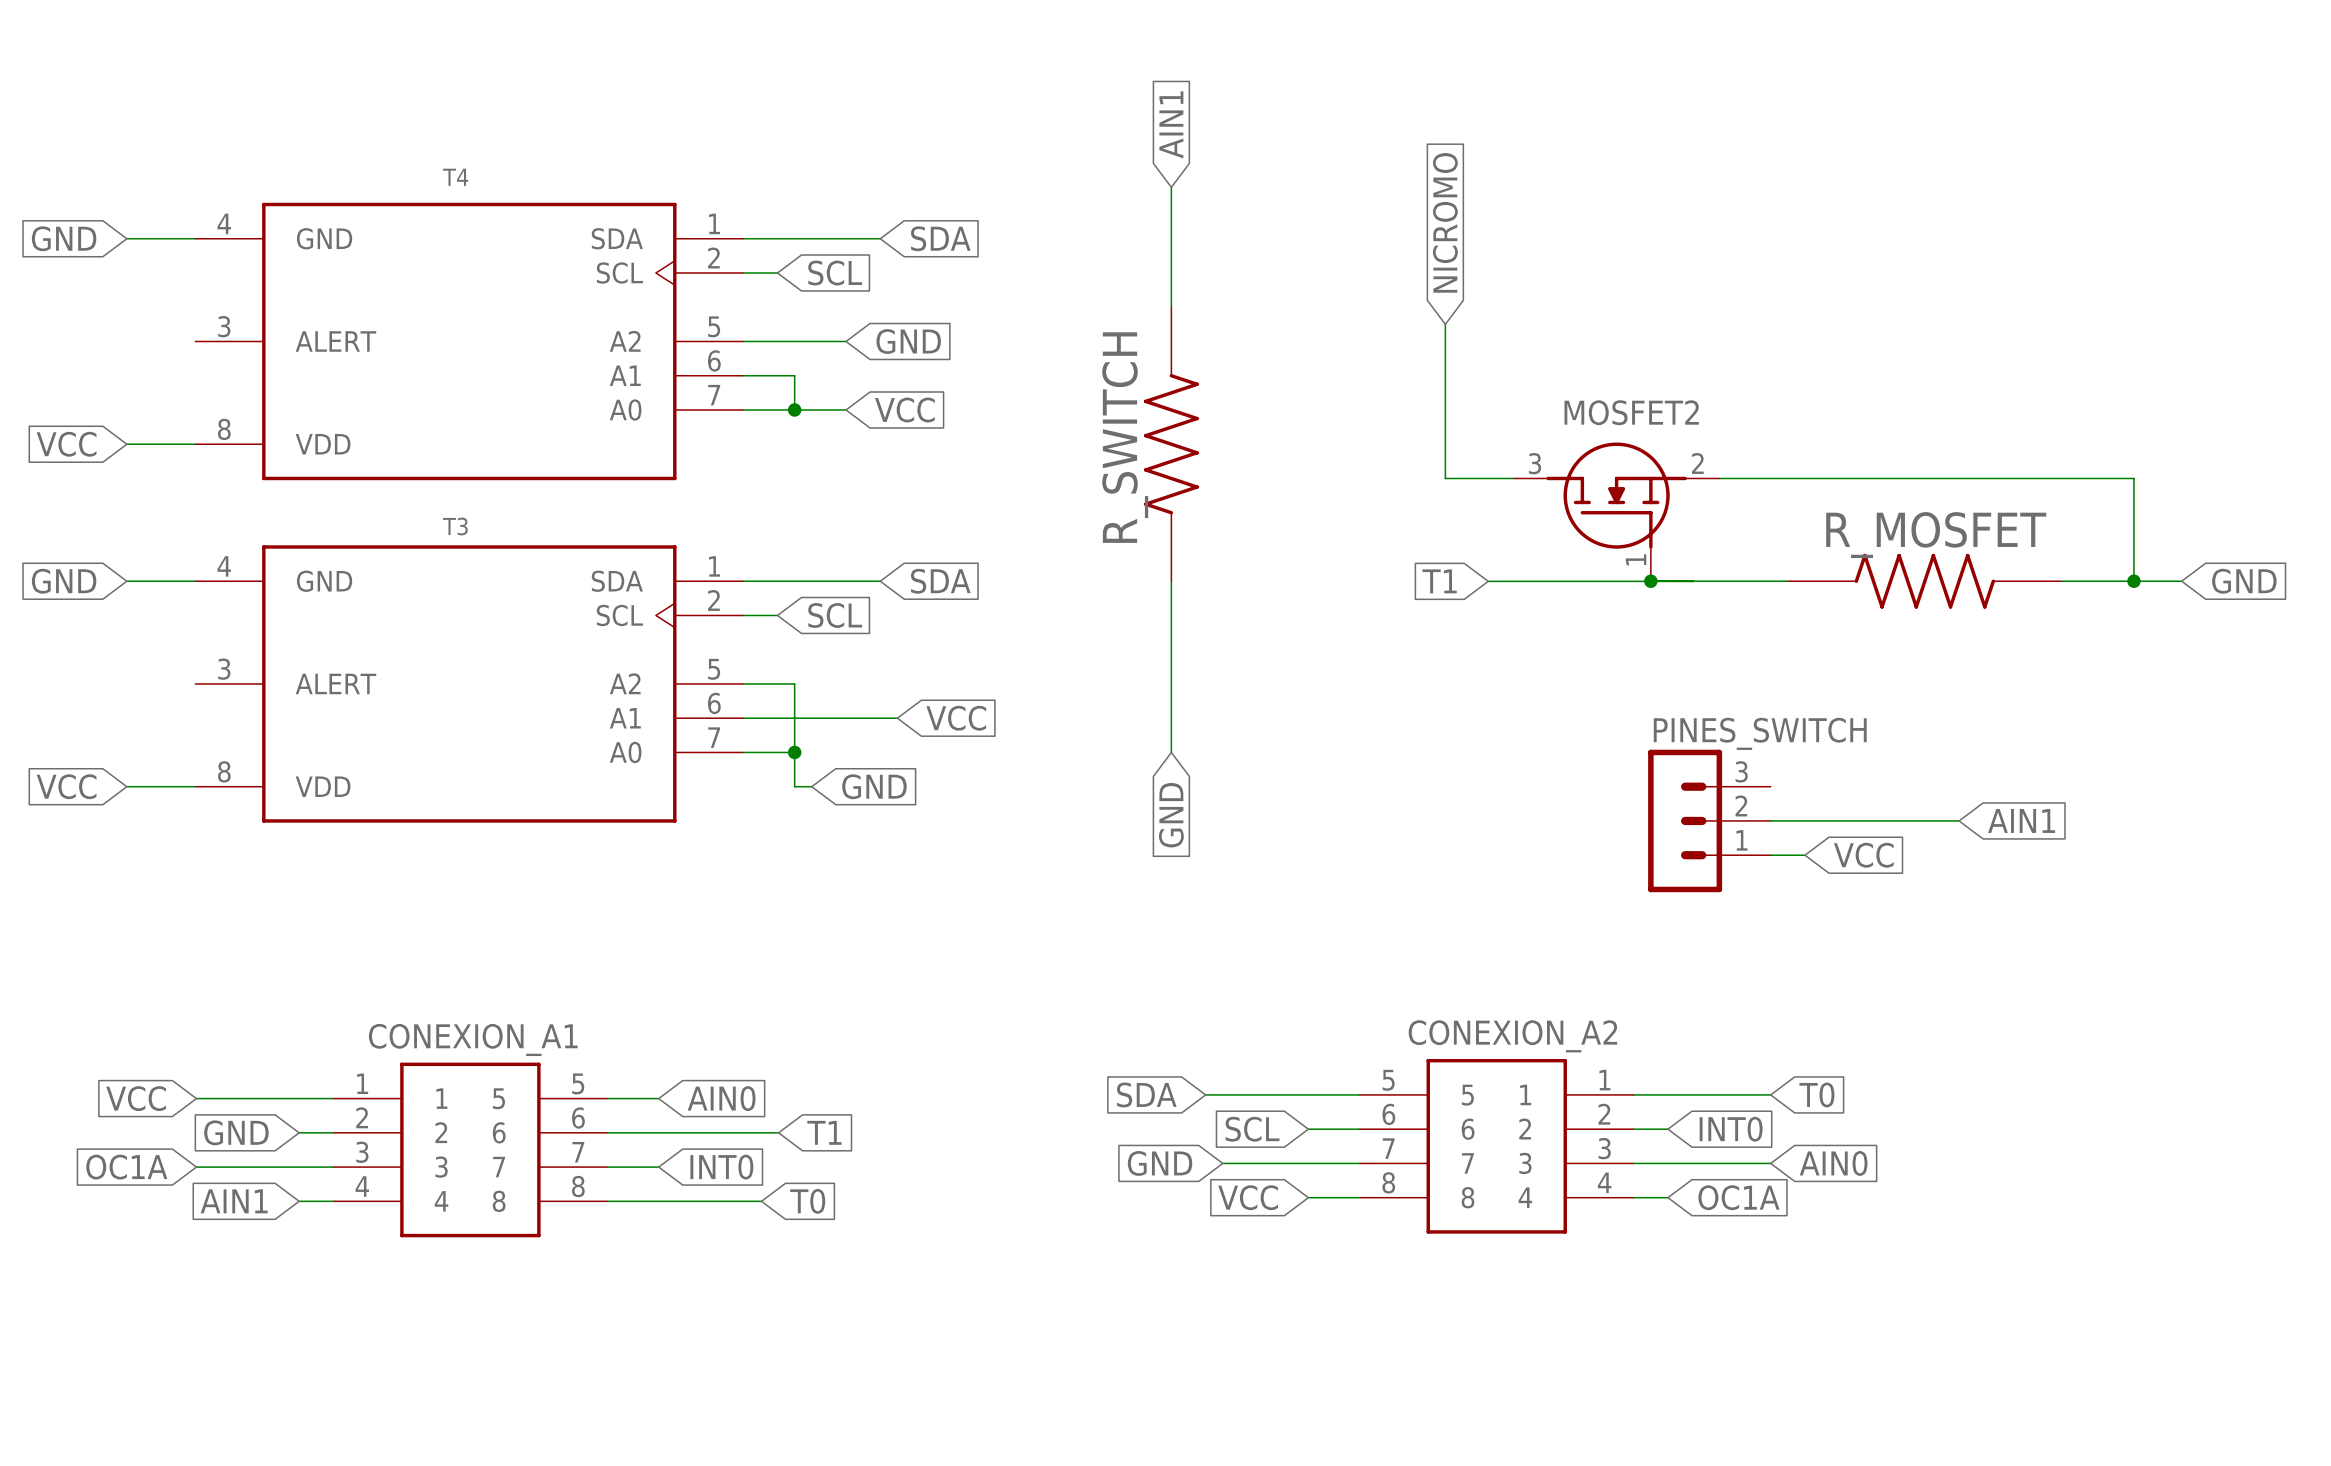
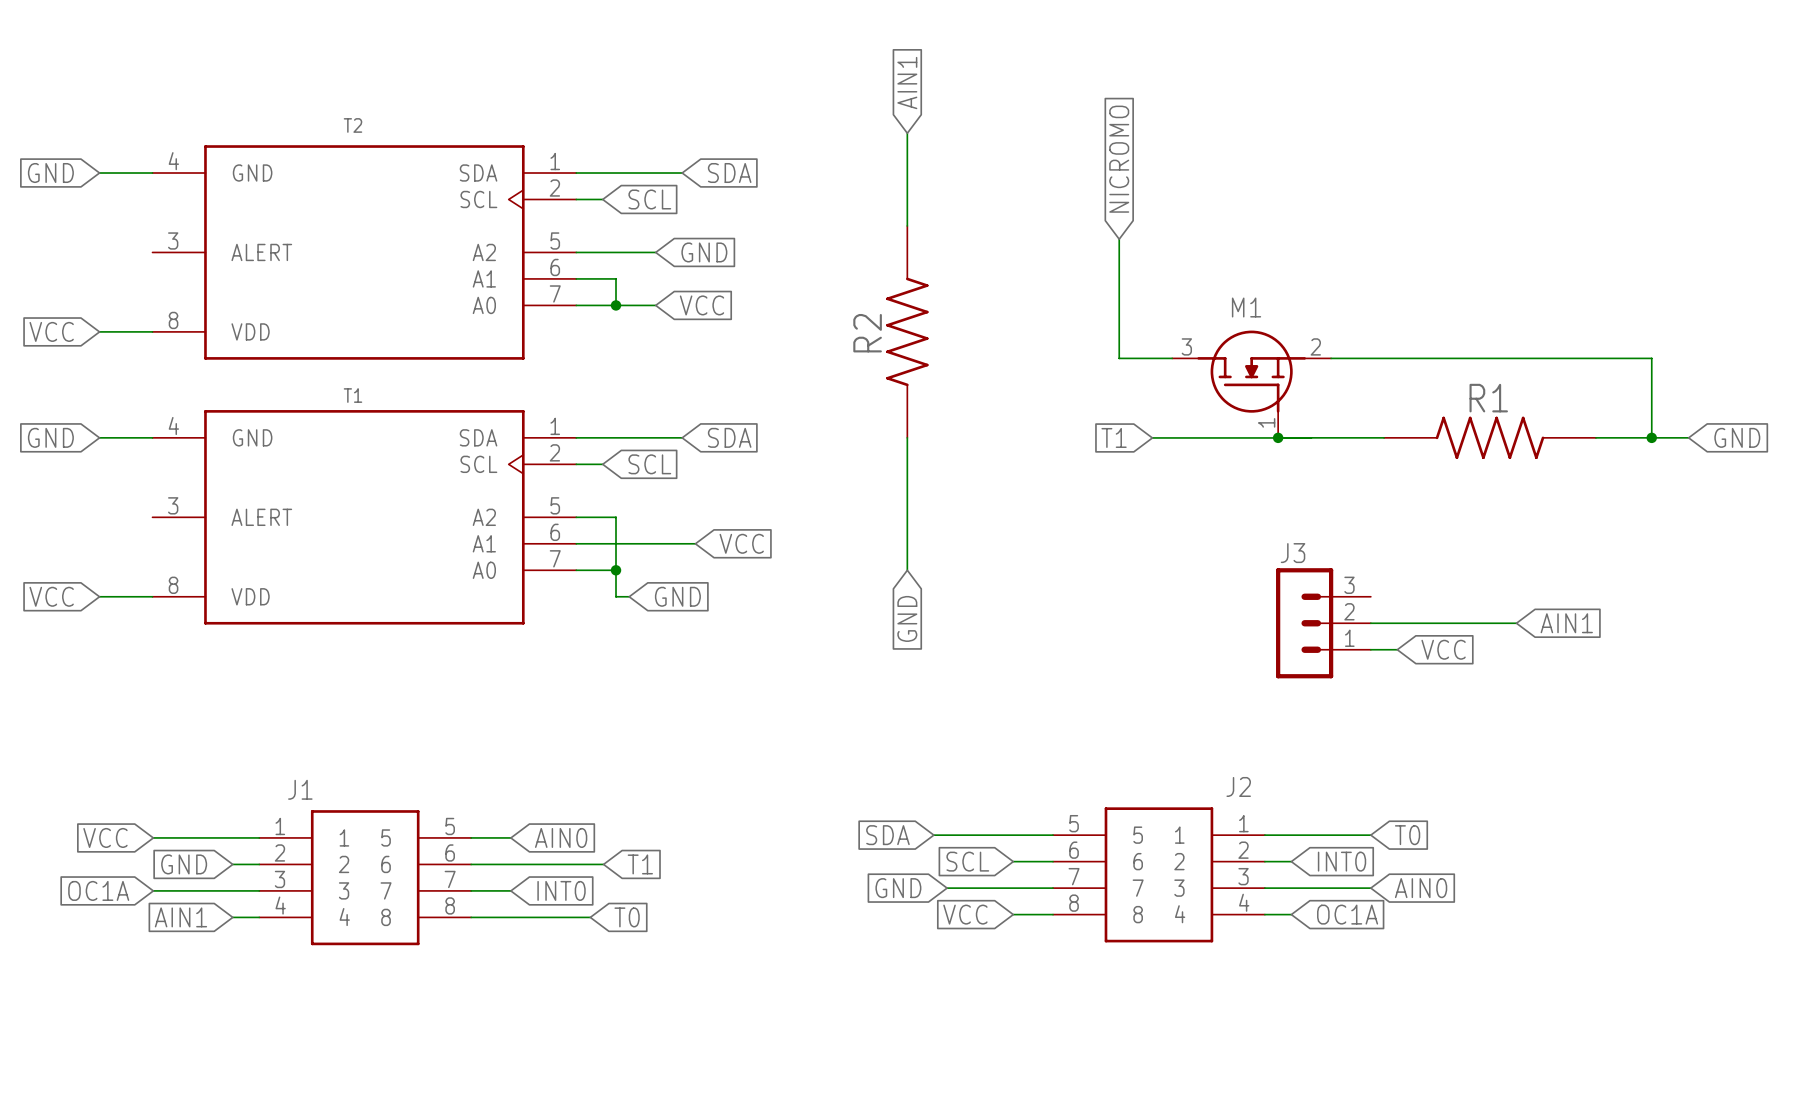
T4 name: T4 (455, 177) -> T2 (352, 125)
MOSFET2 name: MOSFET2 (1631, 412) -> M1 (1246, 307)
R_SWITCH name: R_SWITCH (1125, 437) -> R2 (867, 333)
T3 name: T3 (455, 526) -> T1 (352, 395)
R_MOSFET name: R_MOSFET (1936, 535) -> R1 (1488, 398)
PINES_SWITCH name: PINES_SWITCH (1760, 733) -> J3 (1293, 553)
CONEXION_A2 name: CONEXION_A2 (1512, 1036) -> J2 (1238, 786)
CONEXION_A1 name: CONEXION_A1 (473, 1039) -> J1 (300, 789)

